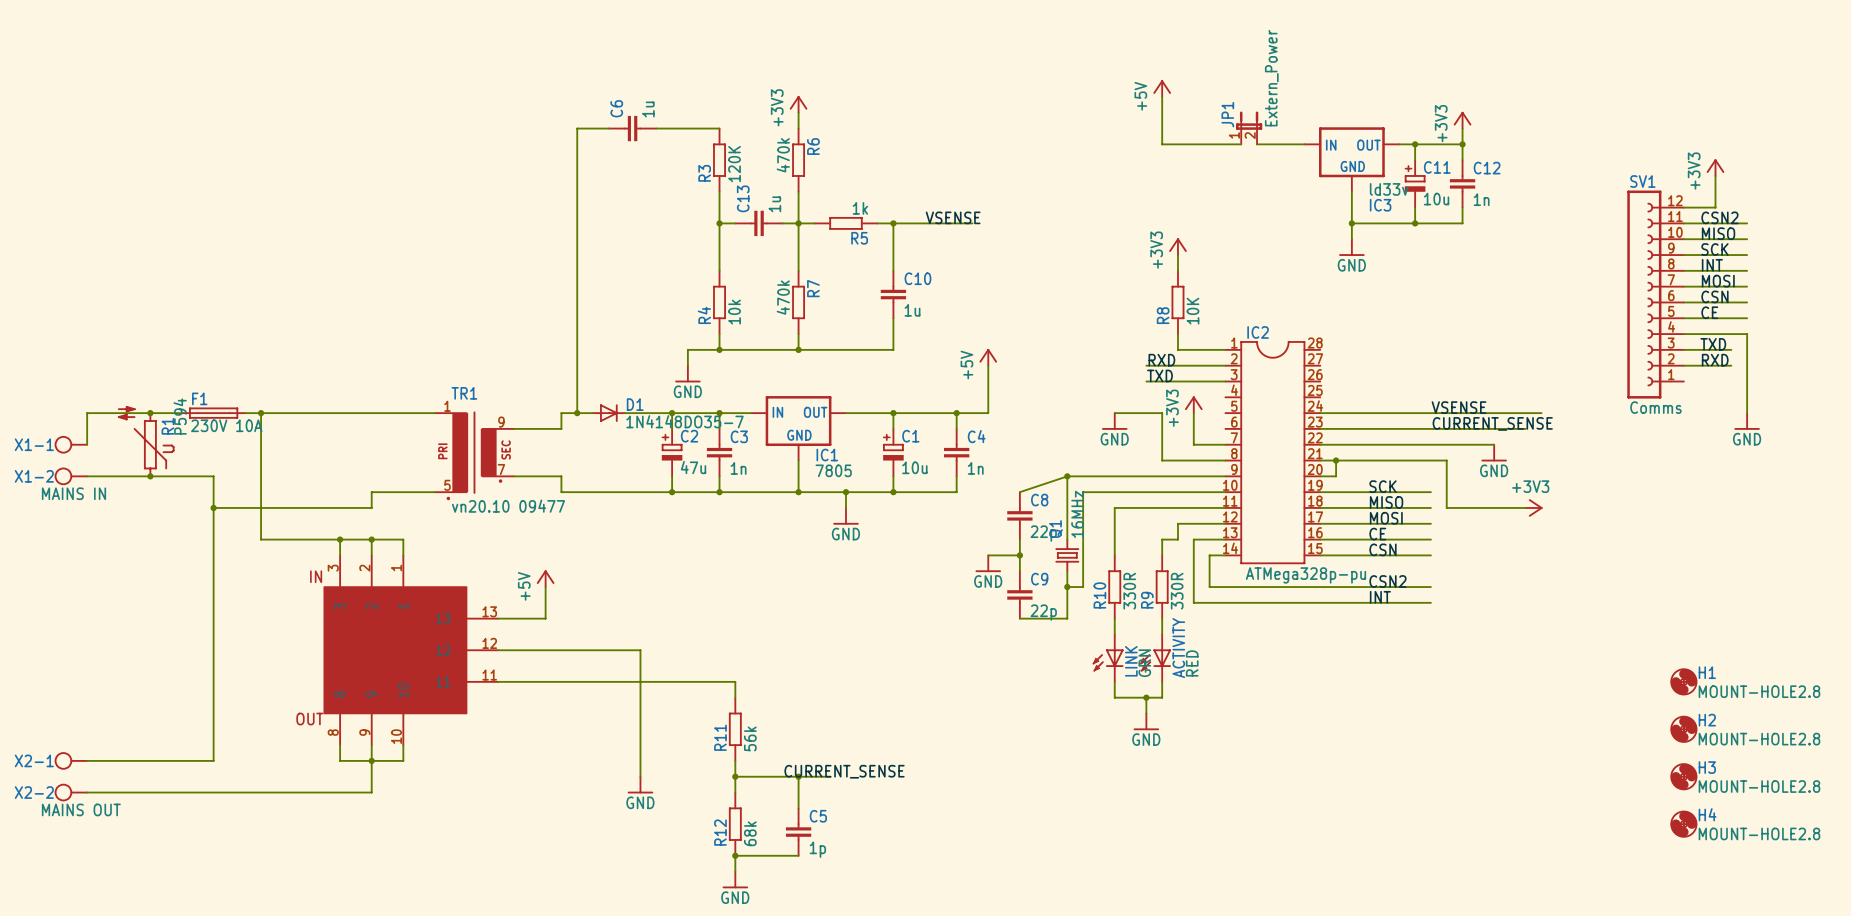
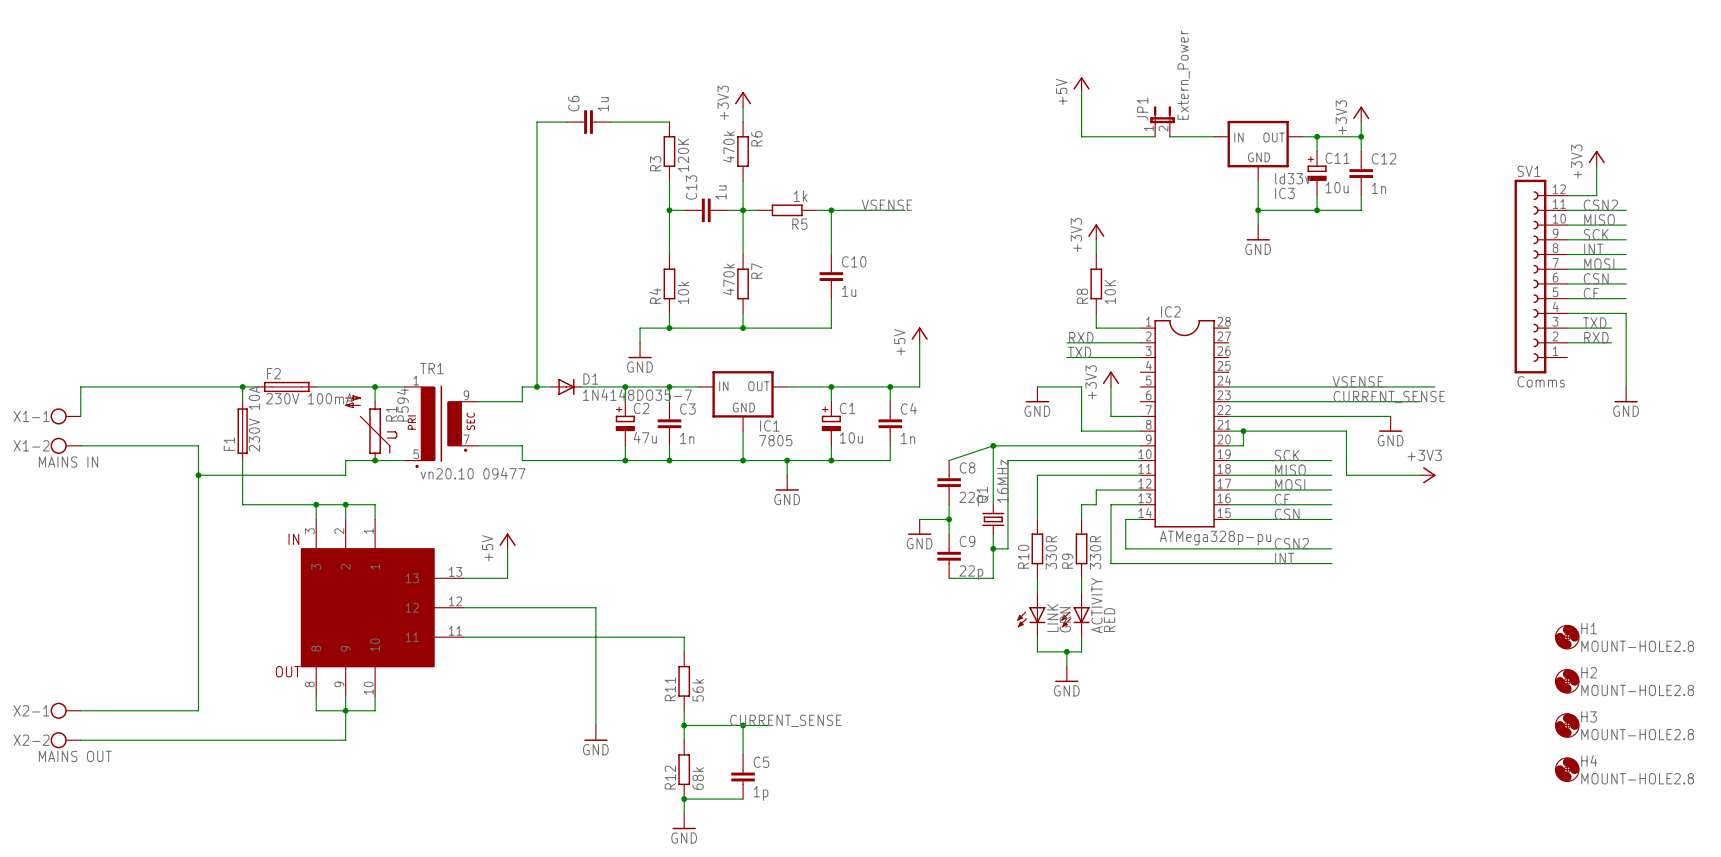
F1 name position: F1 (199, 398) -> F1 (229, 444)
junction: (150, 413) -> none
F1 rotation: 0° (213, 413) -> 90° clockwise (242, 431)
F1 position: (213, 413) -> (242, 431)
F2: none -> 230V 100mA (286, 386)
wire: none -> (375, 386) (375, 401)
junction: none -> (375, 386)
F1 value position: 230V 10A (226, 425) -> 230V 10A (254, 418)
R1 position: (146, 441) -> (371, 428)
junction: (150, 476) -> none
junction: none -> (375, 460)

